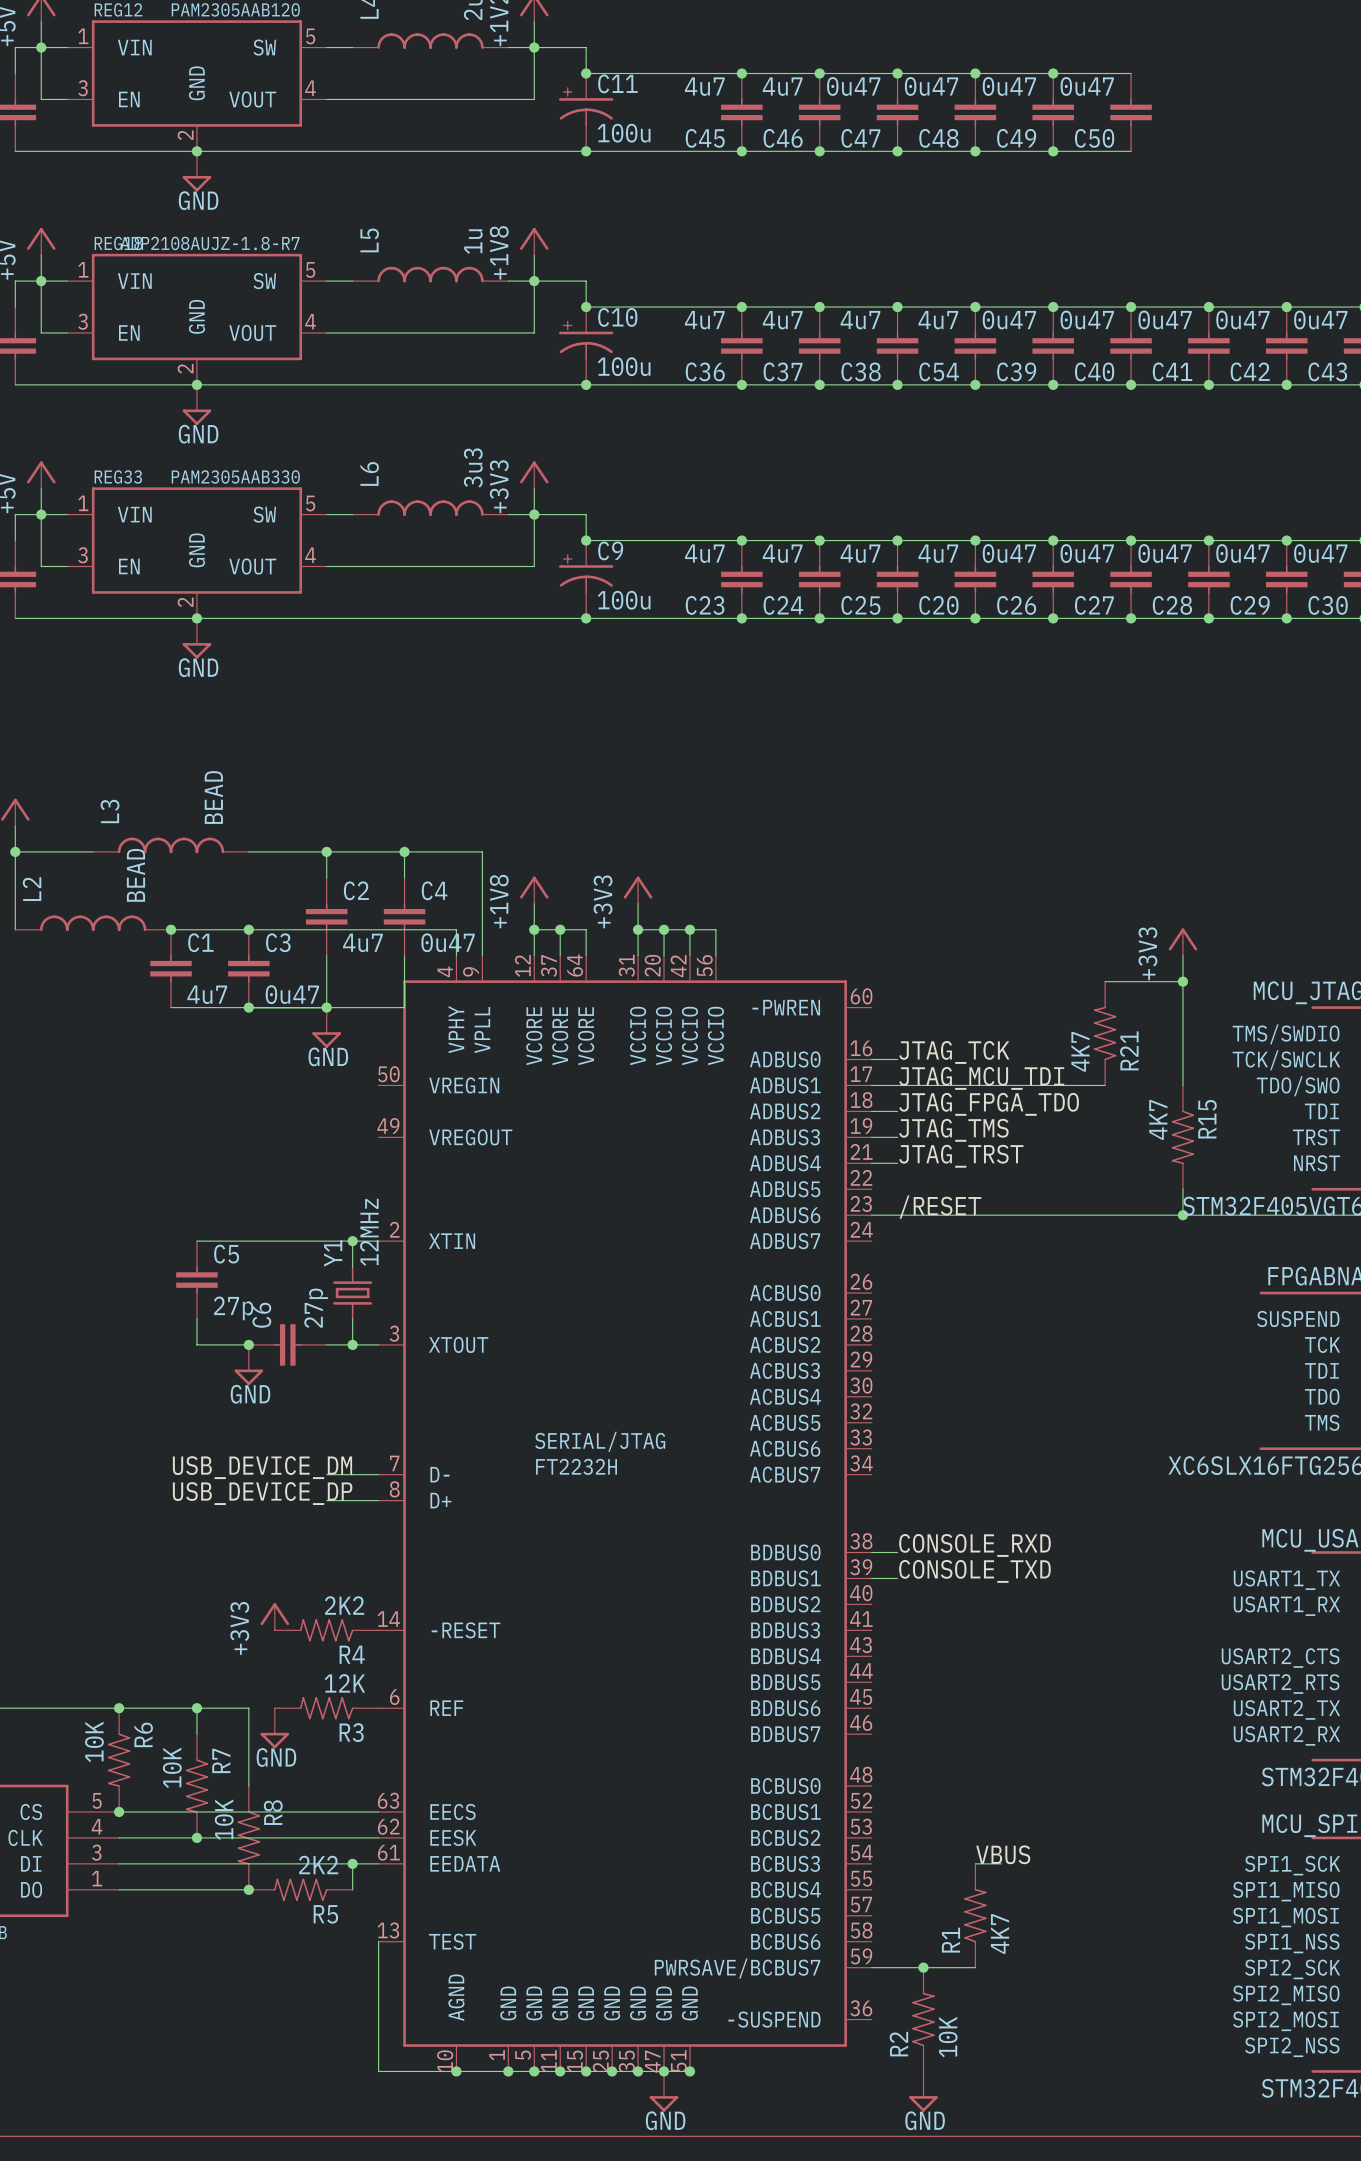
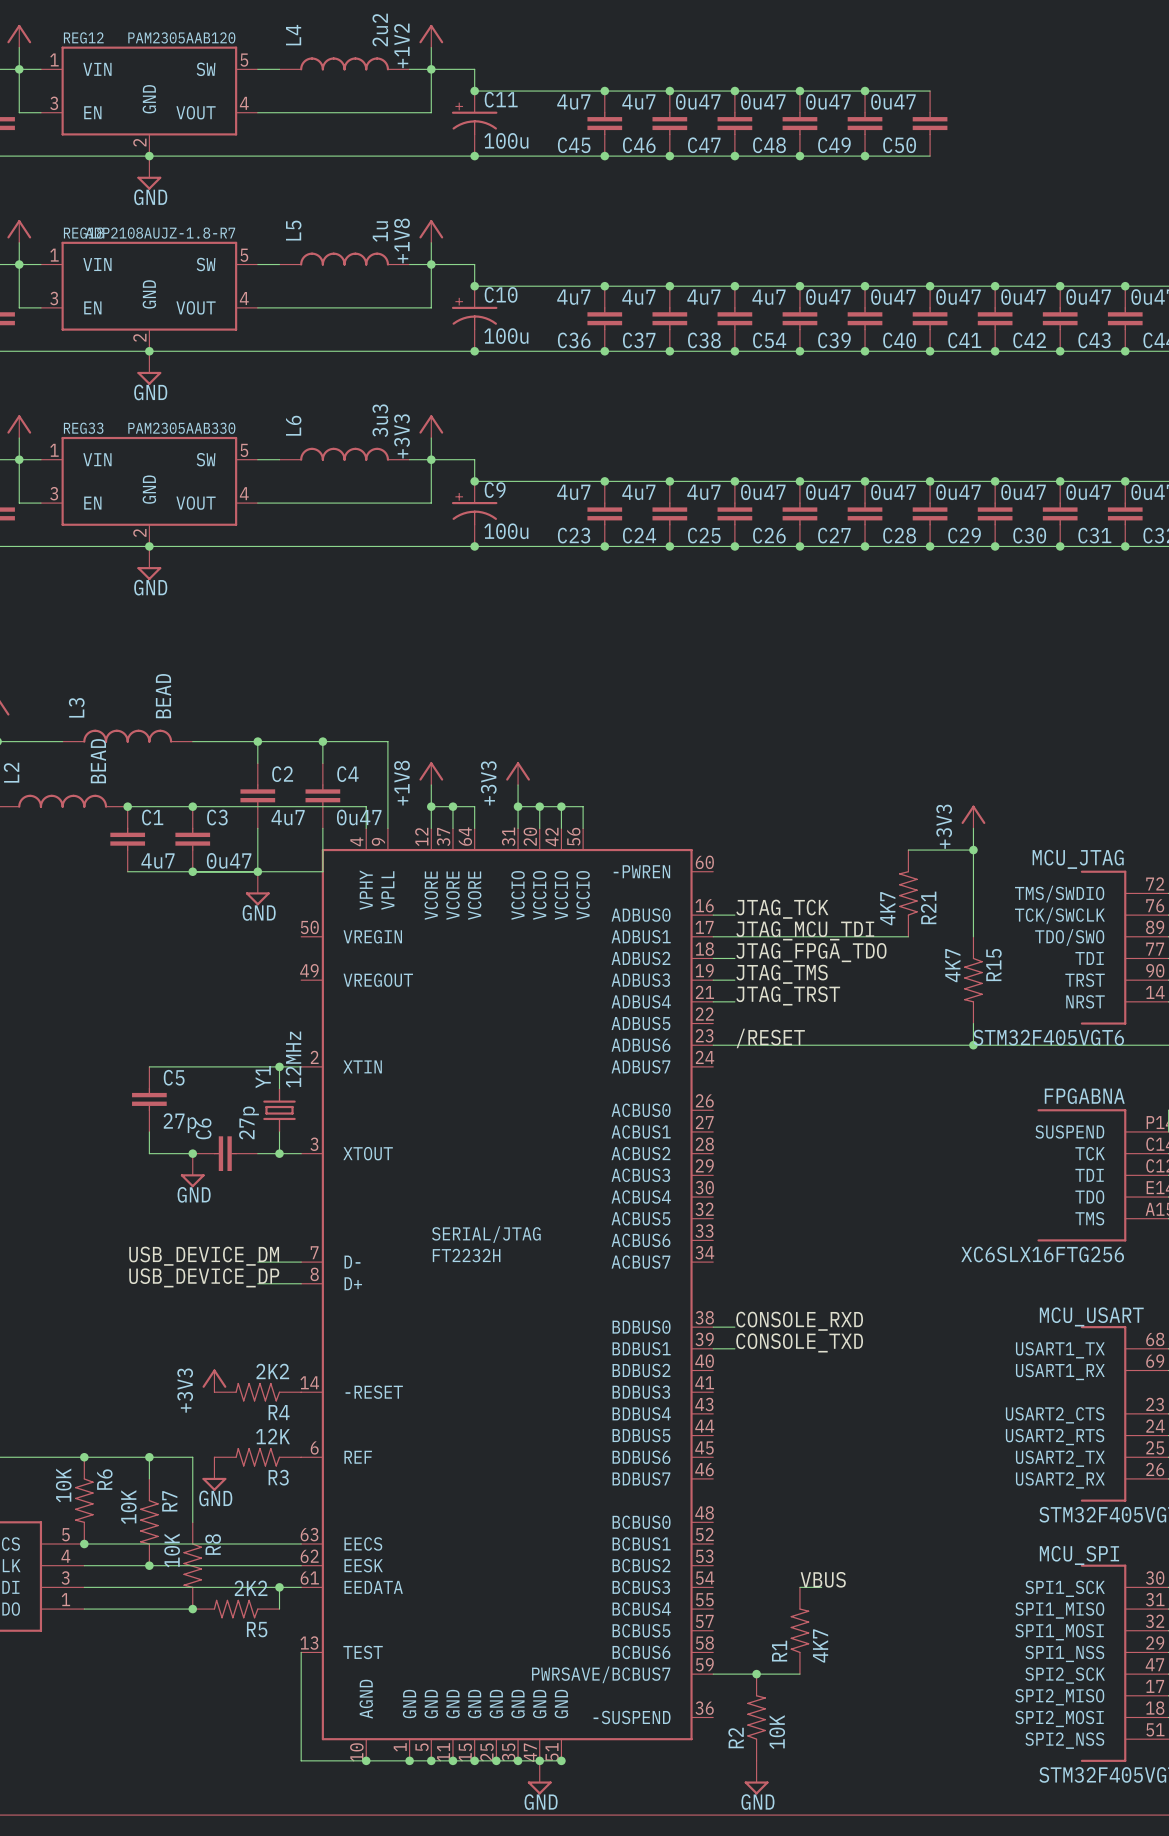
C20 value: 4u7 (938, 553) -> 0u47 (763, 492)
C20 name: C20 (938, 605) -> C26 (769, 535)
C26 name: C26 (1016, 605) -> C27 (834, 535)
C27 name: C27 (1094, 605) -> C28 (899, 535)
C28 name: C28 (1172, 605) -> C29 (964, 535)
C29 name: C29 (1250, 605) -> C30 (1029, 535)
C30 name: C30 (1328, 605) -> C31 (1094, 535)

